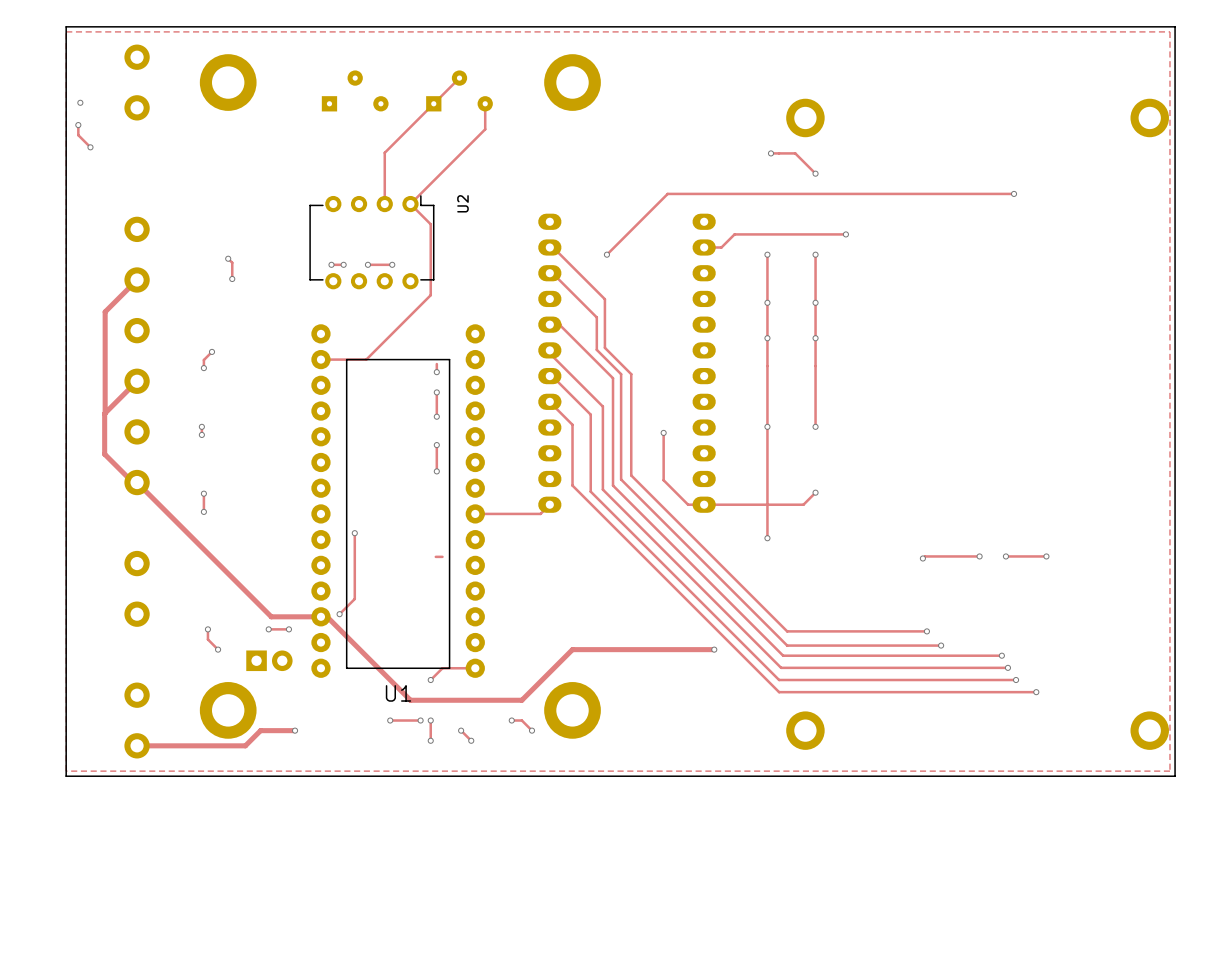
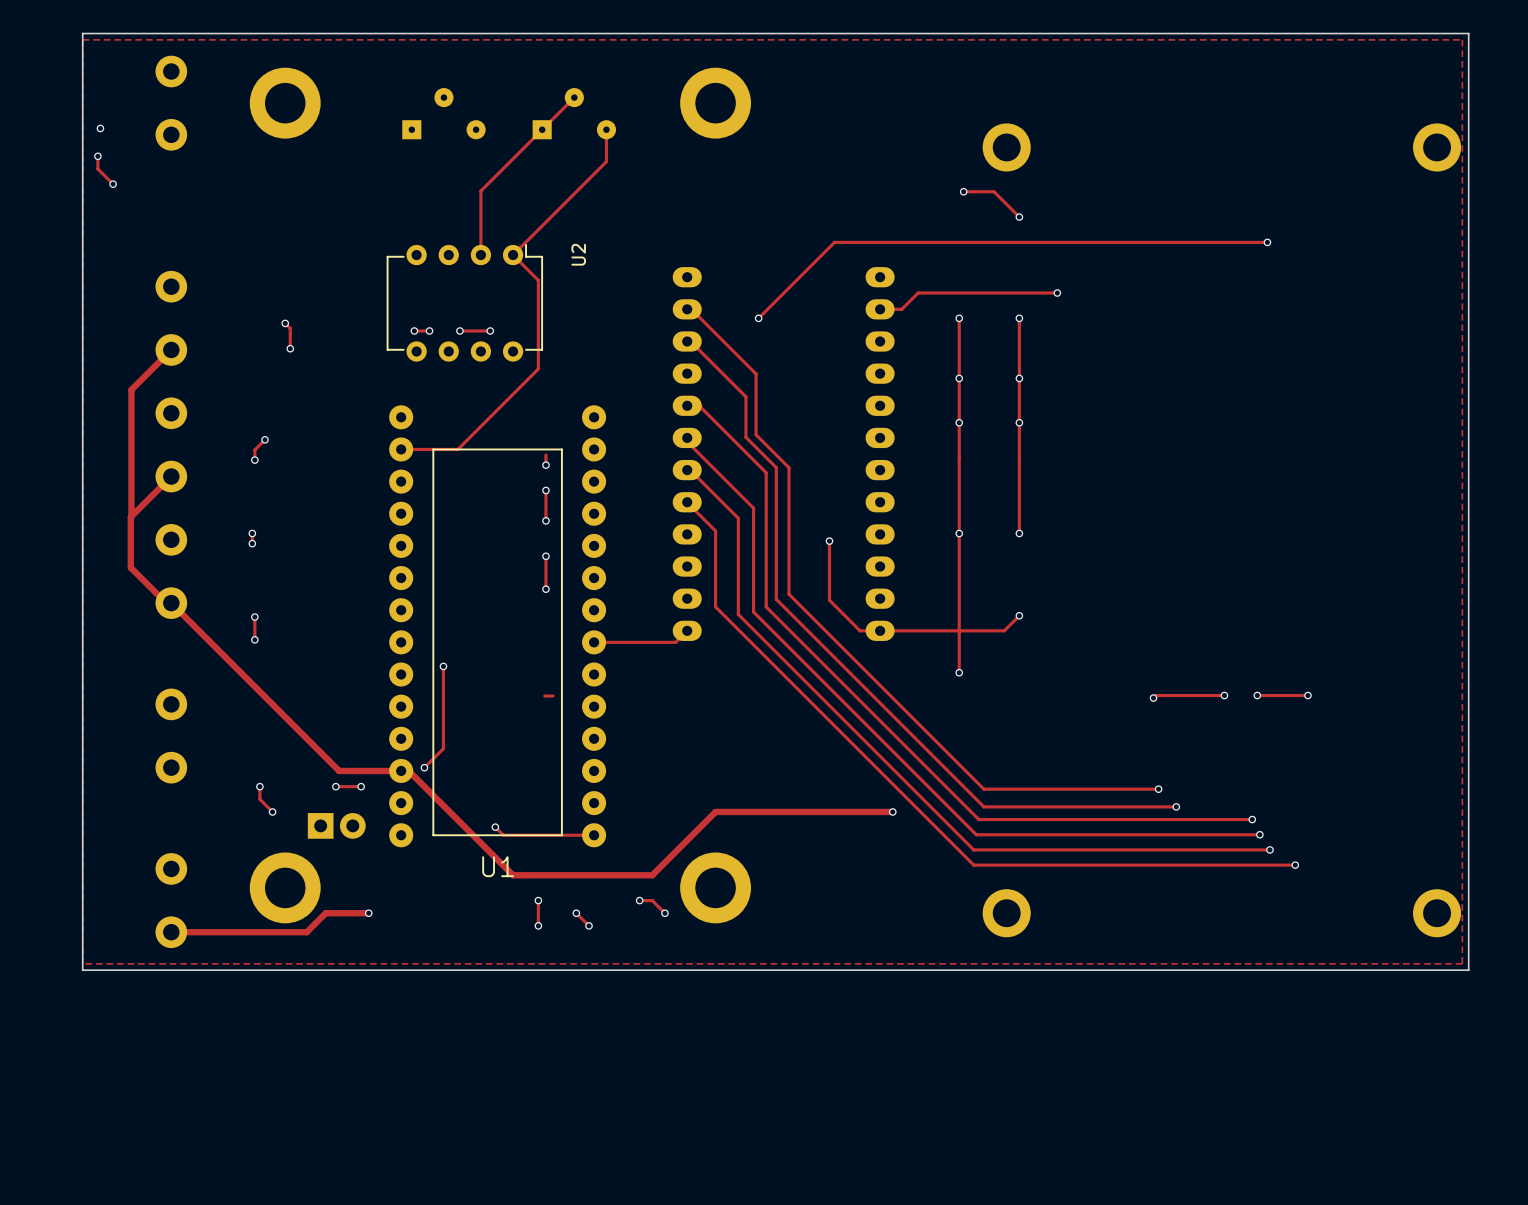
via: none -> (495, 827)
track: (442, 668) (430, 680) -> (553, 835) (503, 835) (495, 827)
via: (430, 680) -> none
track: (390, 720) (420, 720) -> none
via: (390, 720) -> none
via: (420, 720) -> none

